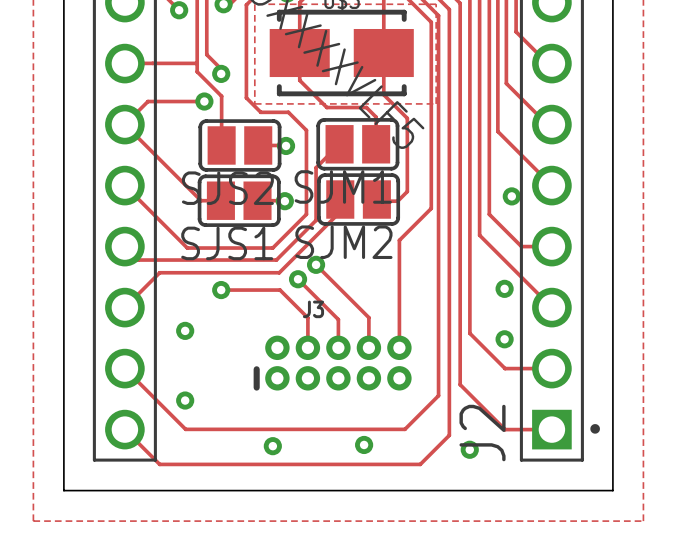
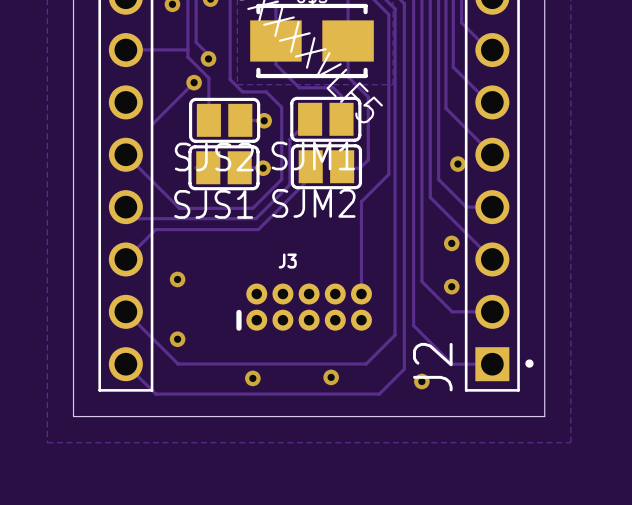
track: (204, 101) (147, 101) (124, 124) (201, 200) (206, 200) -> (194, 82) (152, 124)
track: (316, 264) (368, 317) (368, 347) -> none
via: (316, 264) -> none
track: (298, 279) (338, 319) (338, 347) -> none
via: (298, 279) -> none
track: (221, 290) (280, 290) (307, 317) (307, 347) -> none
via: (221, 290) -> none

